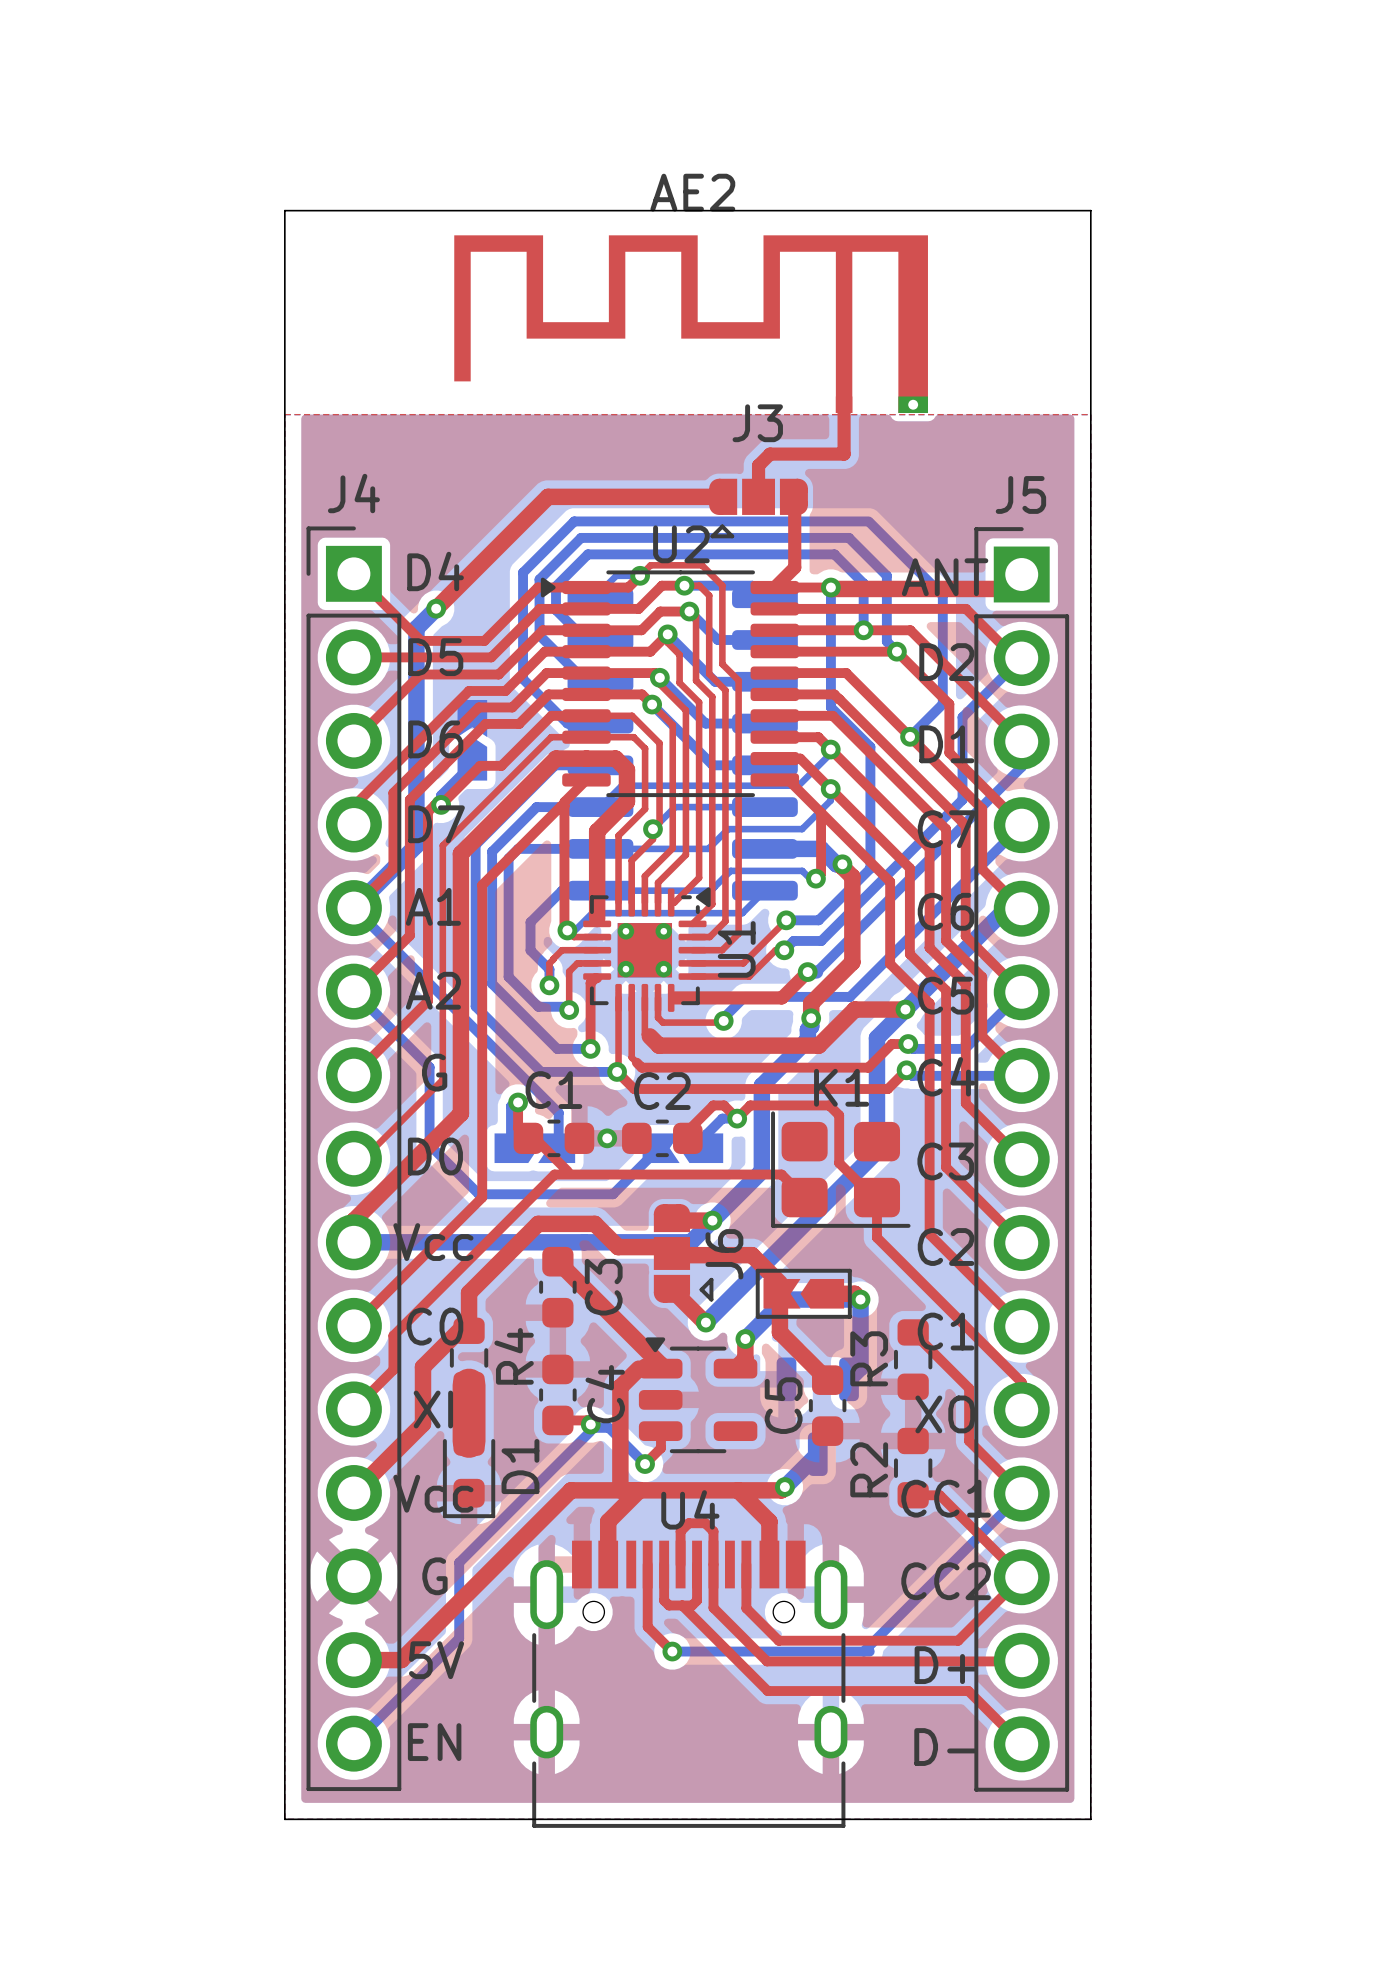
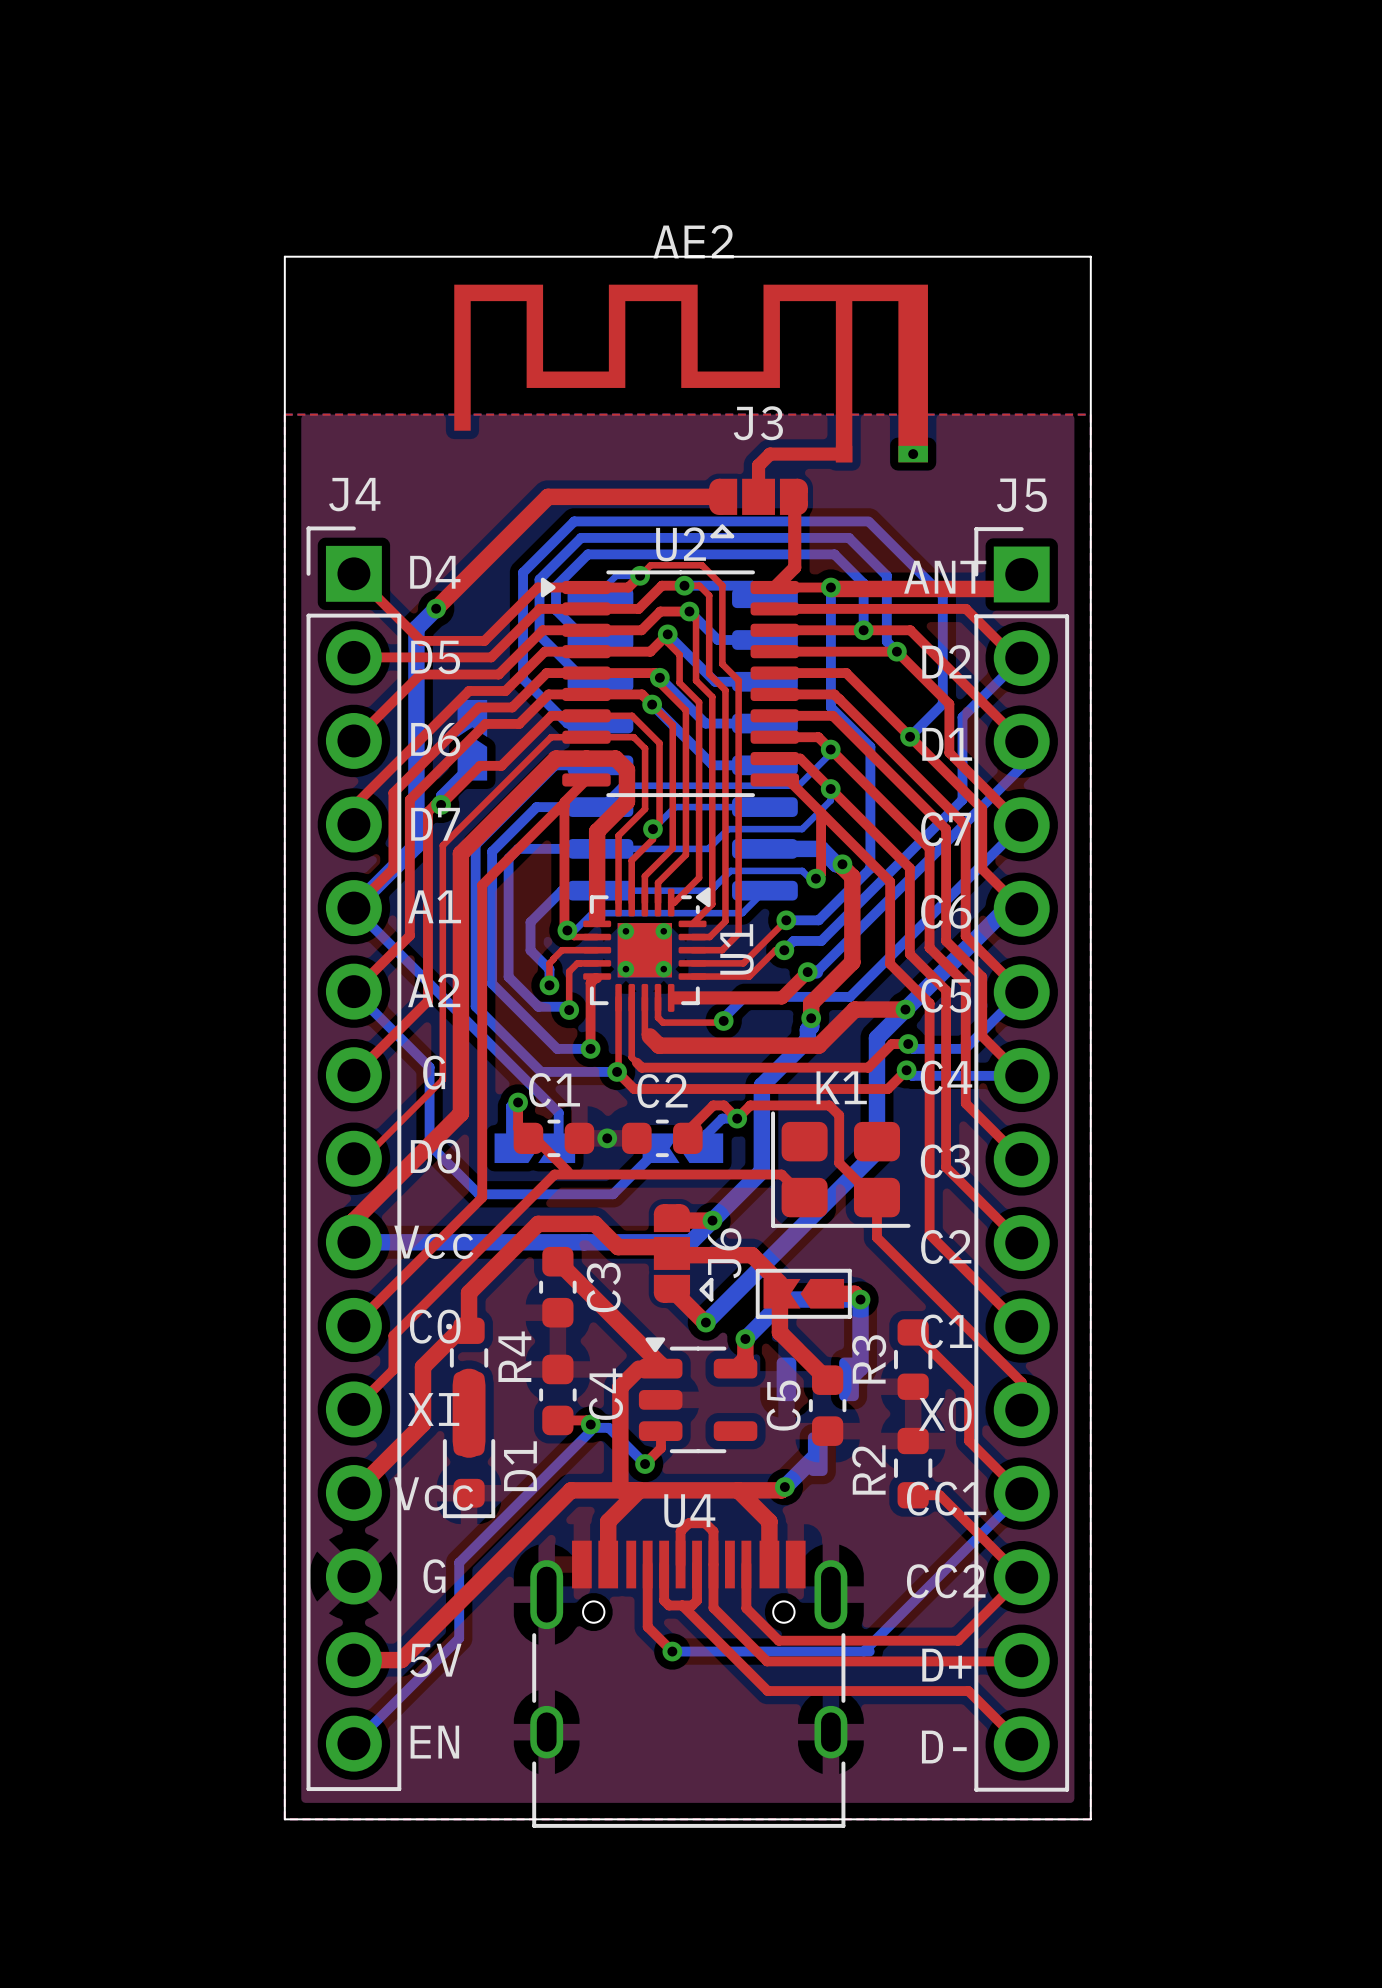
board edge: (284, 256) (284, 210) (1090, 210) (1090, 256) -> (284, 256) (1090, 256)
AE2 position: (691, 324) -> (691, 373)
top track: (844, 404) (844, 454) -> none

